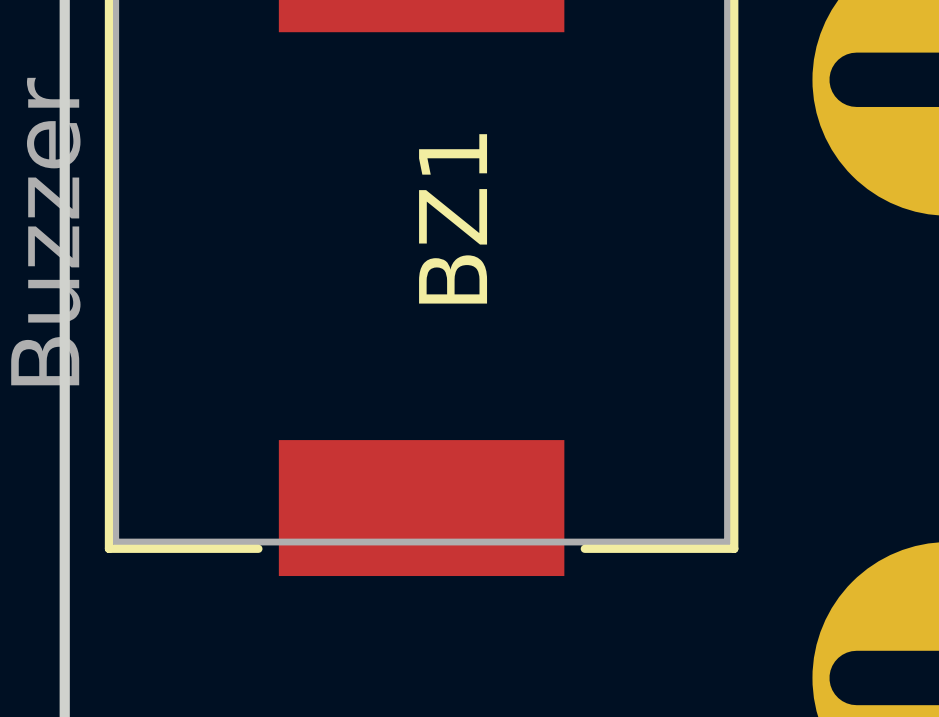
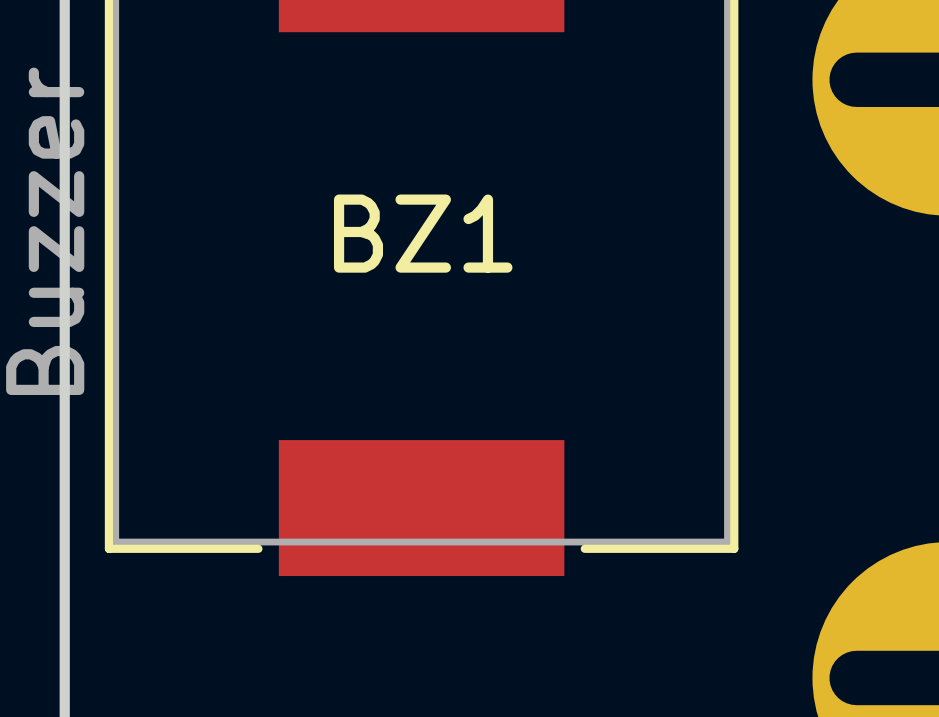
BZ1 name rotation: 0° (453, 218) -> 90° clockwise (423, 233)

